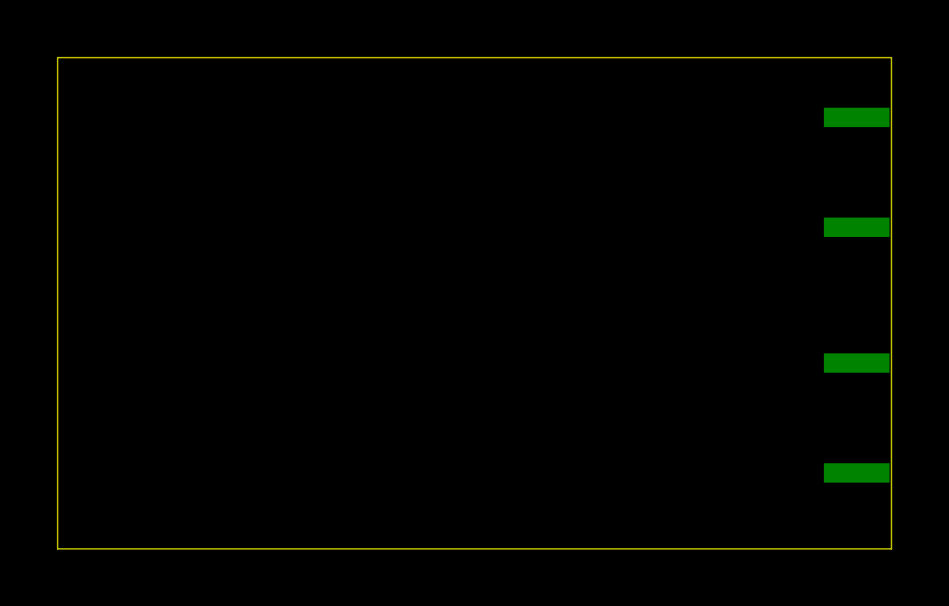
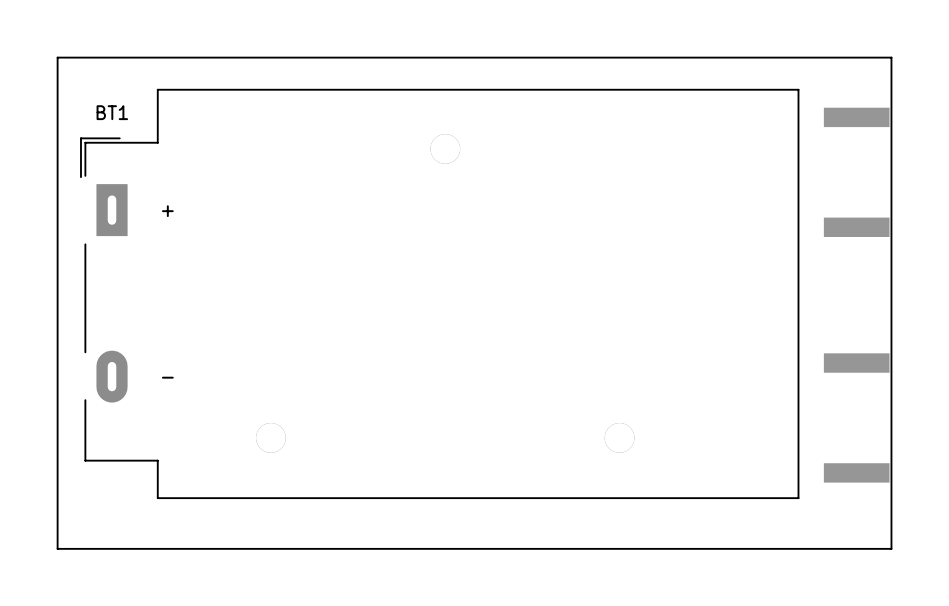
BT1: none -> (439, 293)

